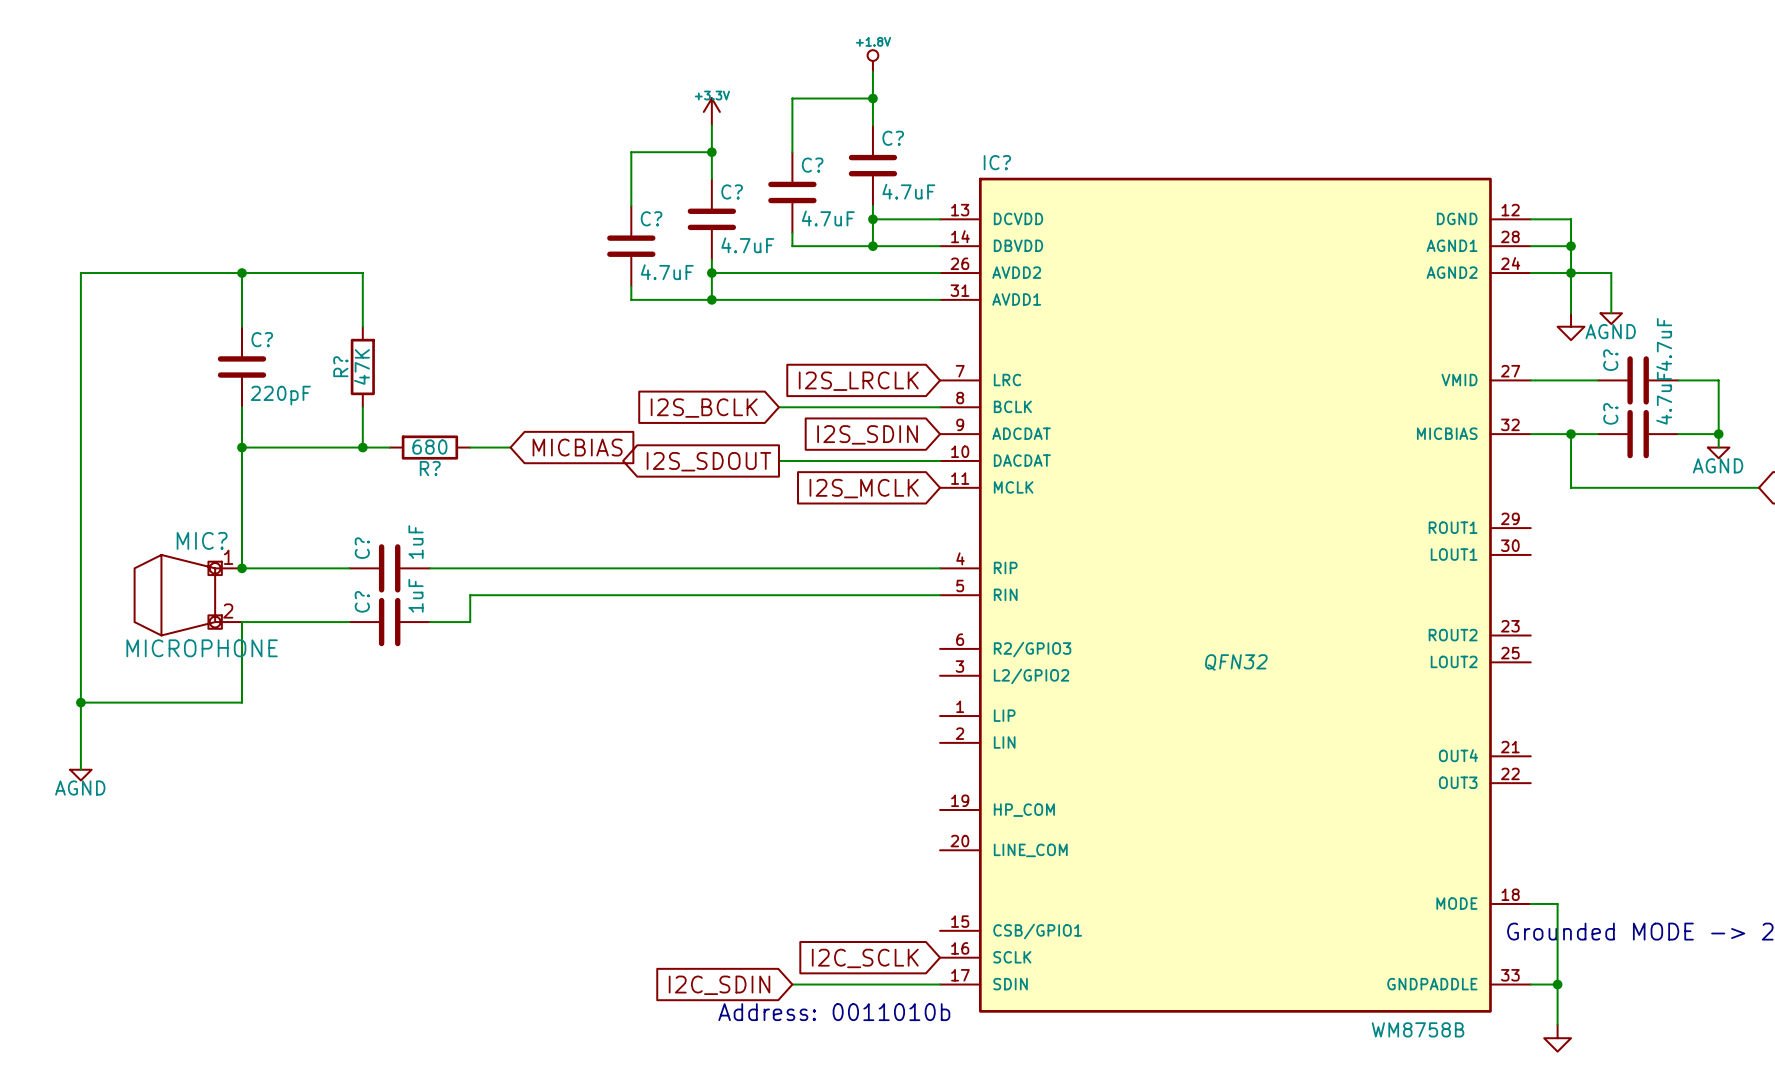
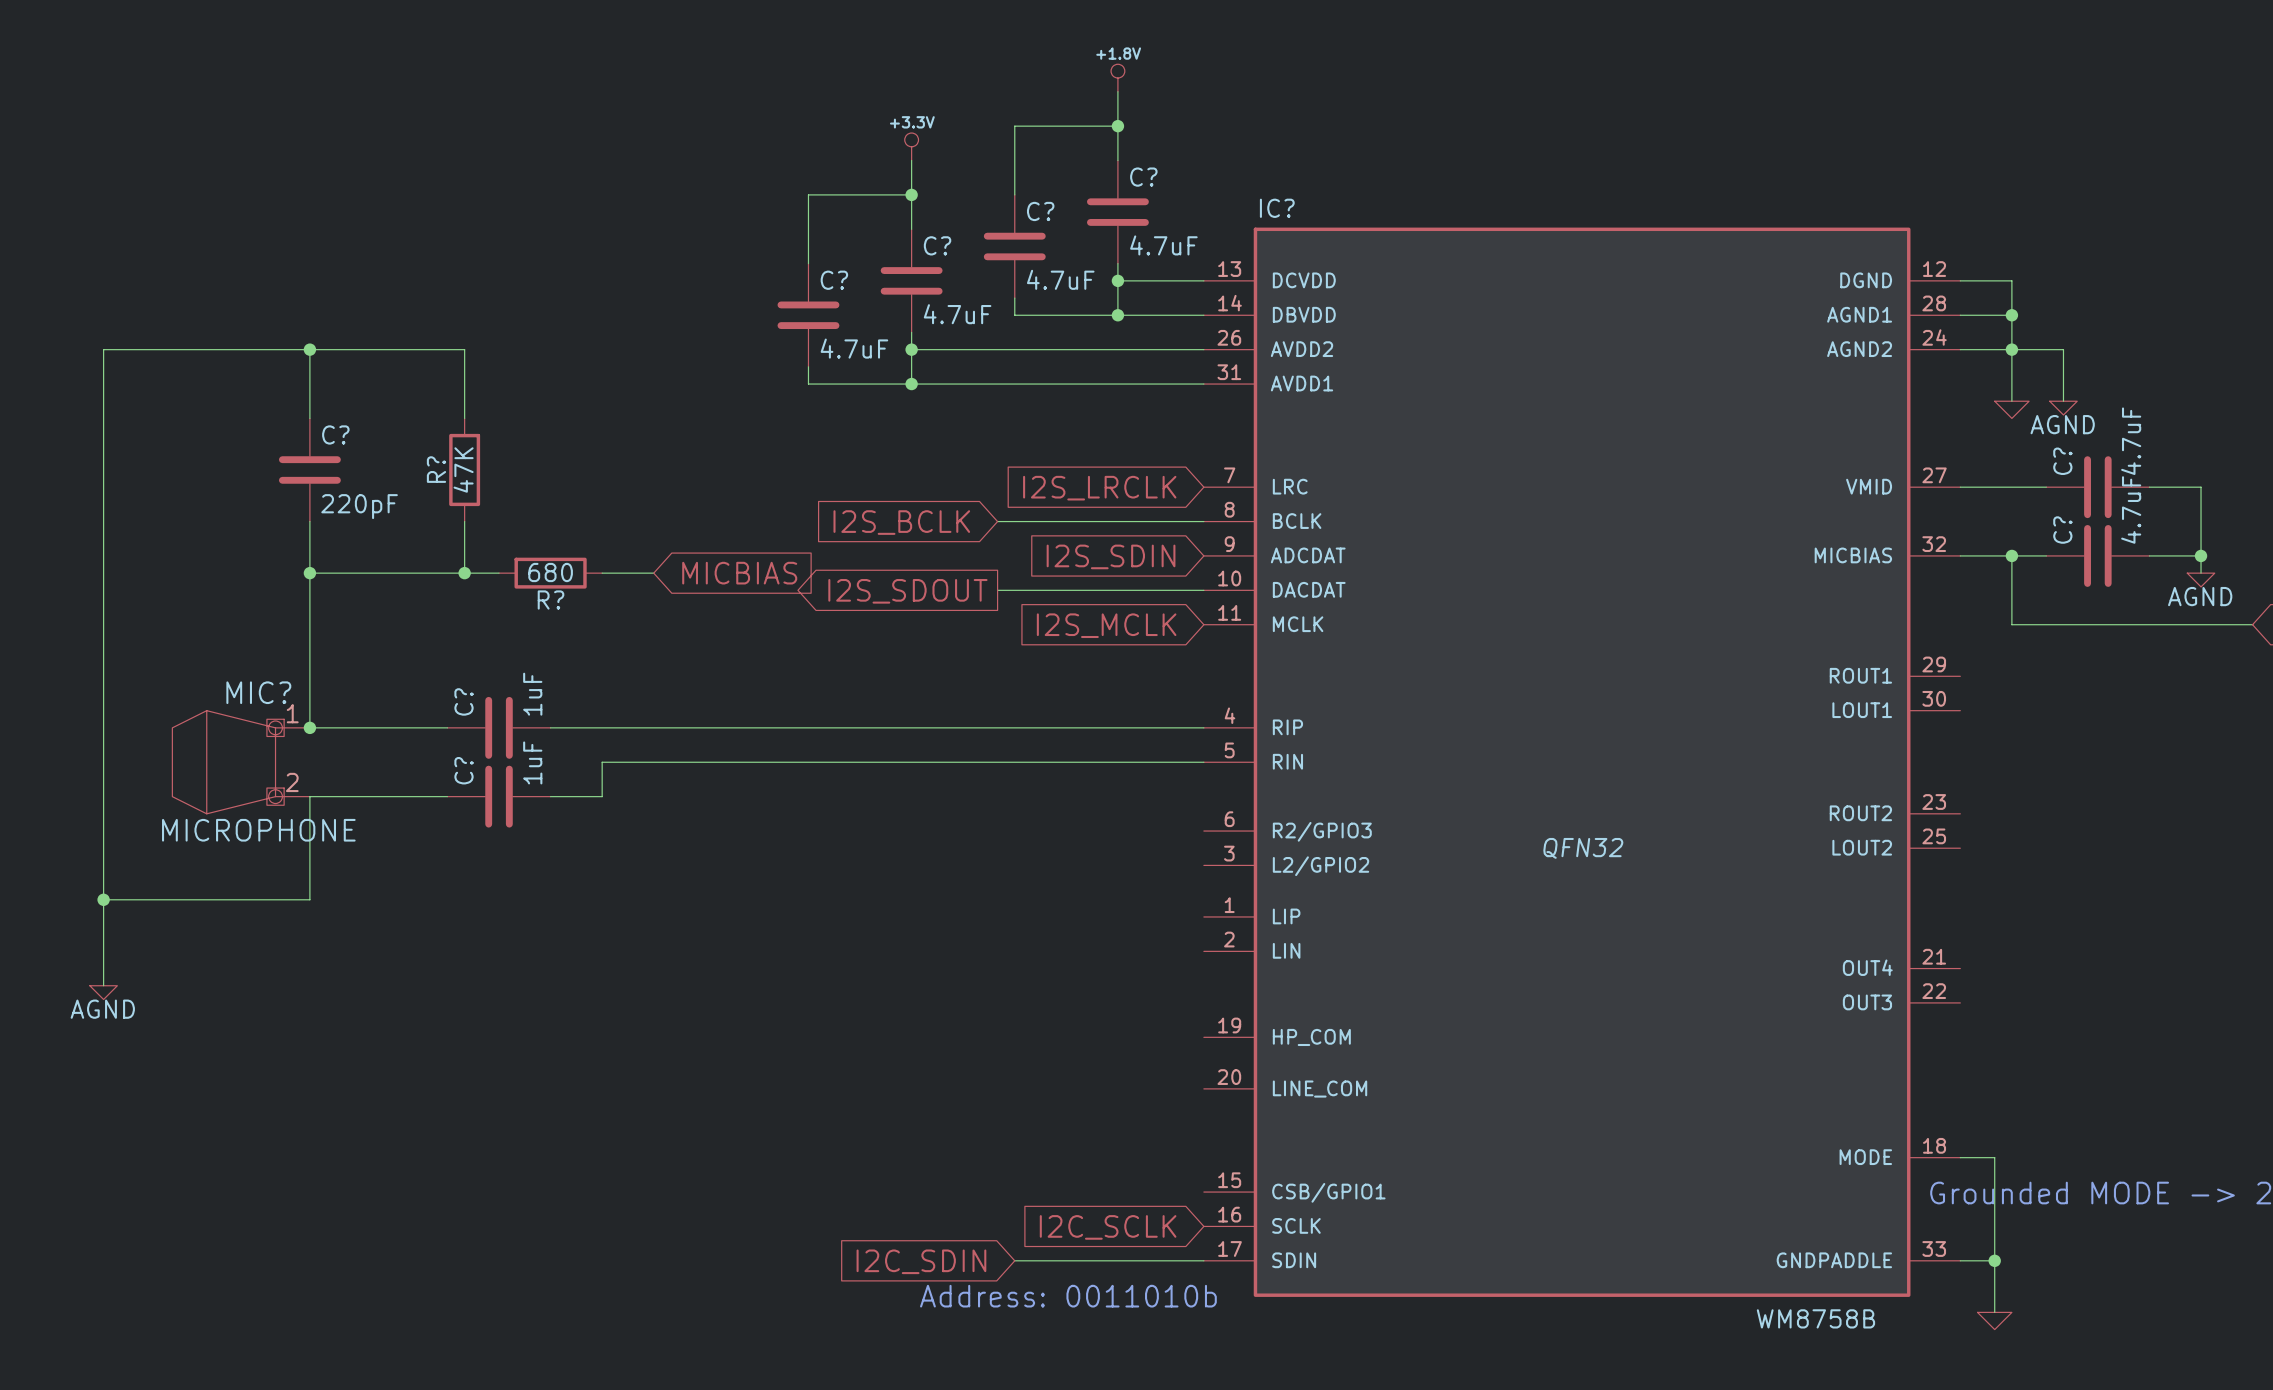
power symbol shape: [703, 98, 720, 126] -> [904, 133, 919, 161]
power symbol shape: [1557, 313, 1585, 341] -> [1994, 401, 2030, 419]
power symbol shape: [1544, 1024, 1572, 1052] -> [1977, 1312, 2012, 1330]

